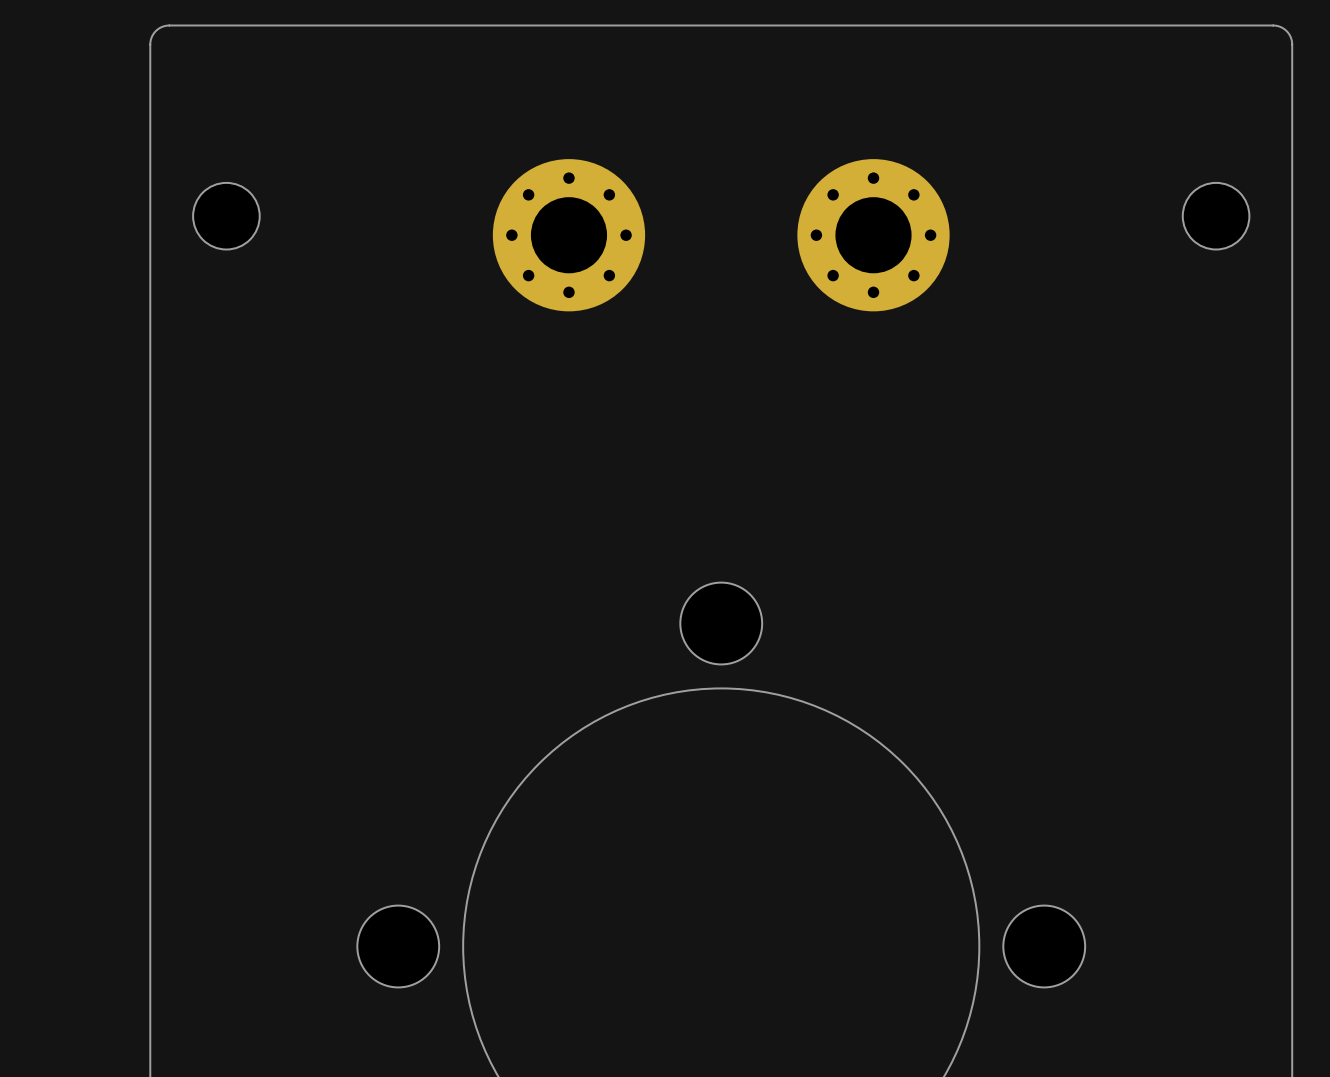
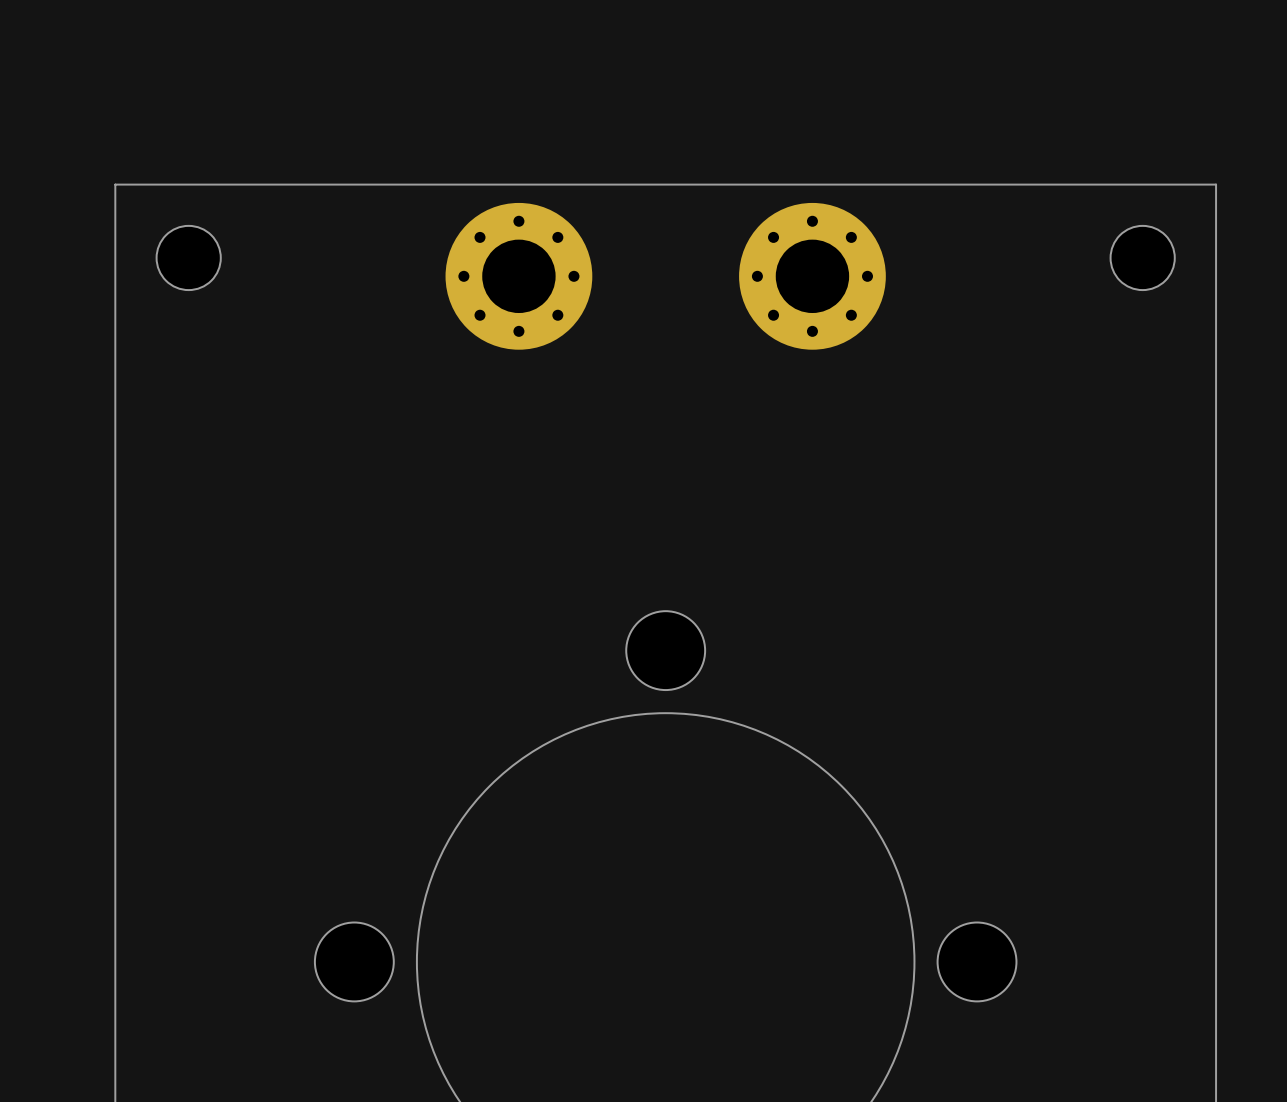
board edge: (1292, 140) (1292, 42) (1285, 29) (1273, 25) (167, 25) (155, 31) (150, 42) (150, 140) -> (1216, 184) (115, 184)

